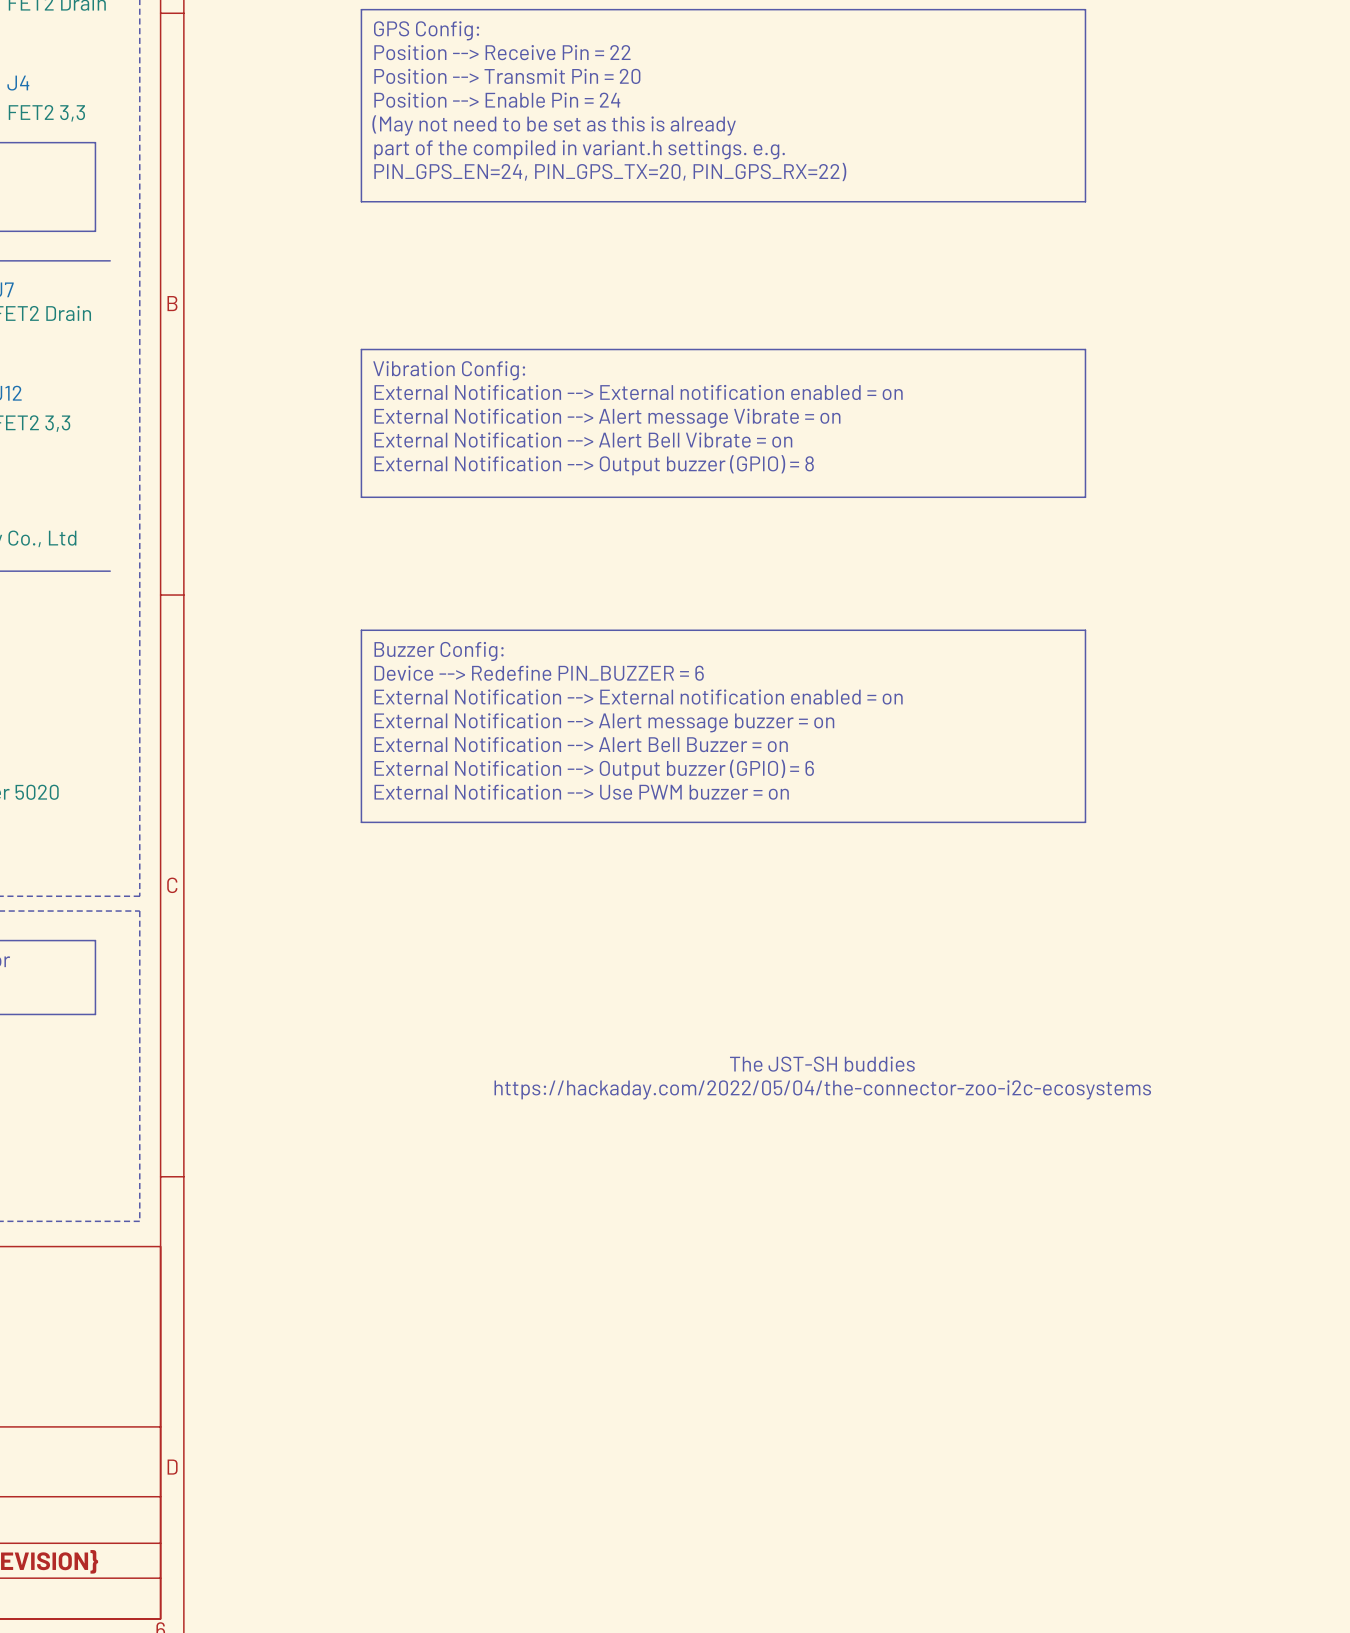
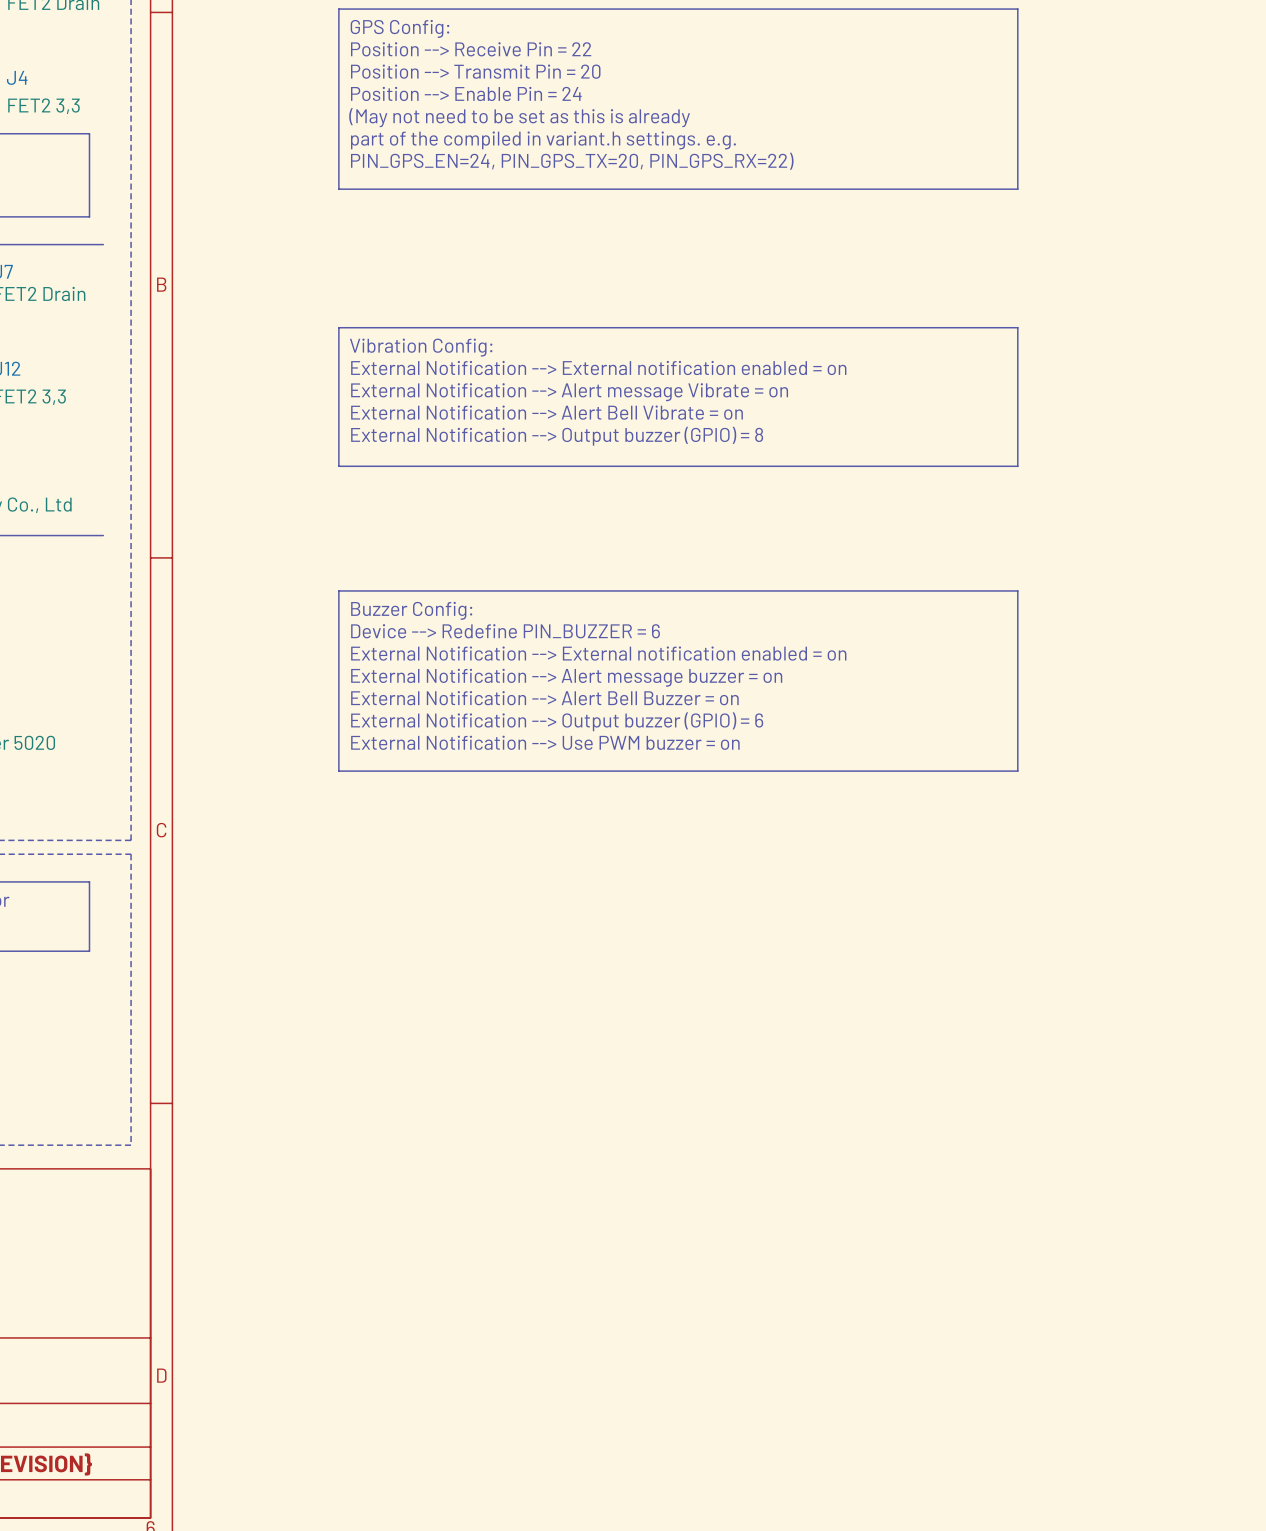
text: The JST-SH buddies (822, 1064) -> none
text: https://hackaday.com/2022/05/04/the-connector-zoo-i2c-ecosystems (822, 1089) -> none

